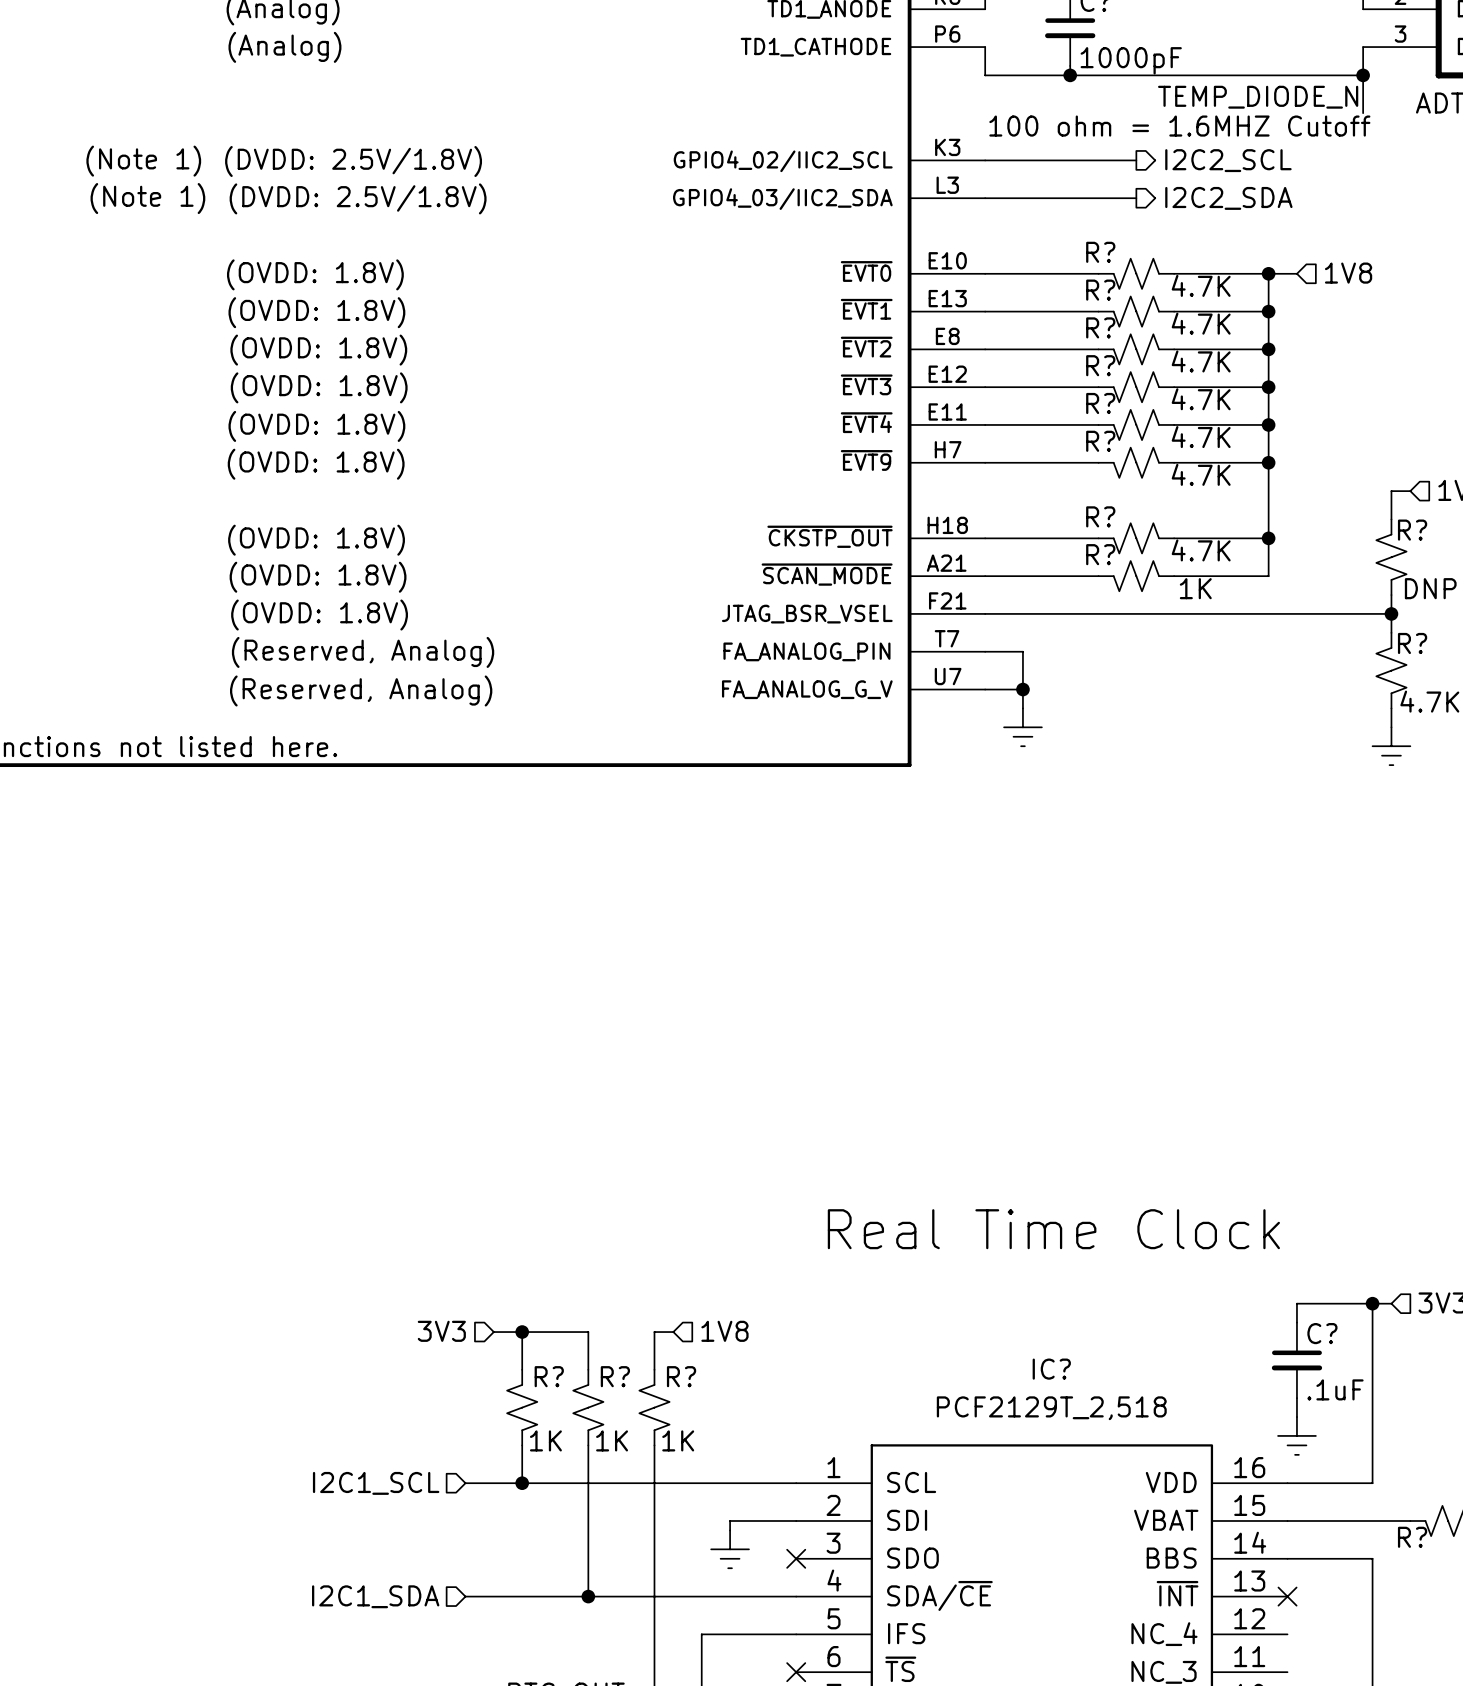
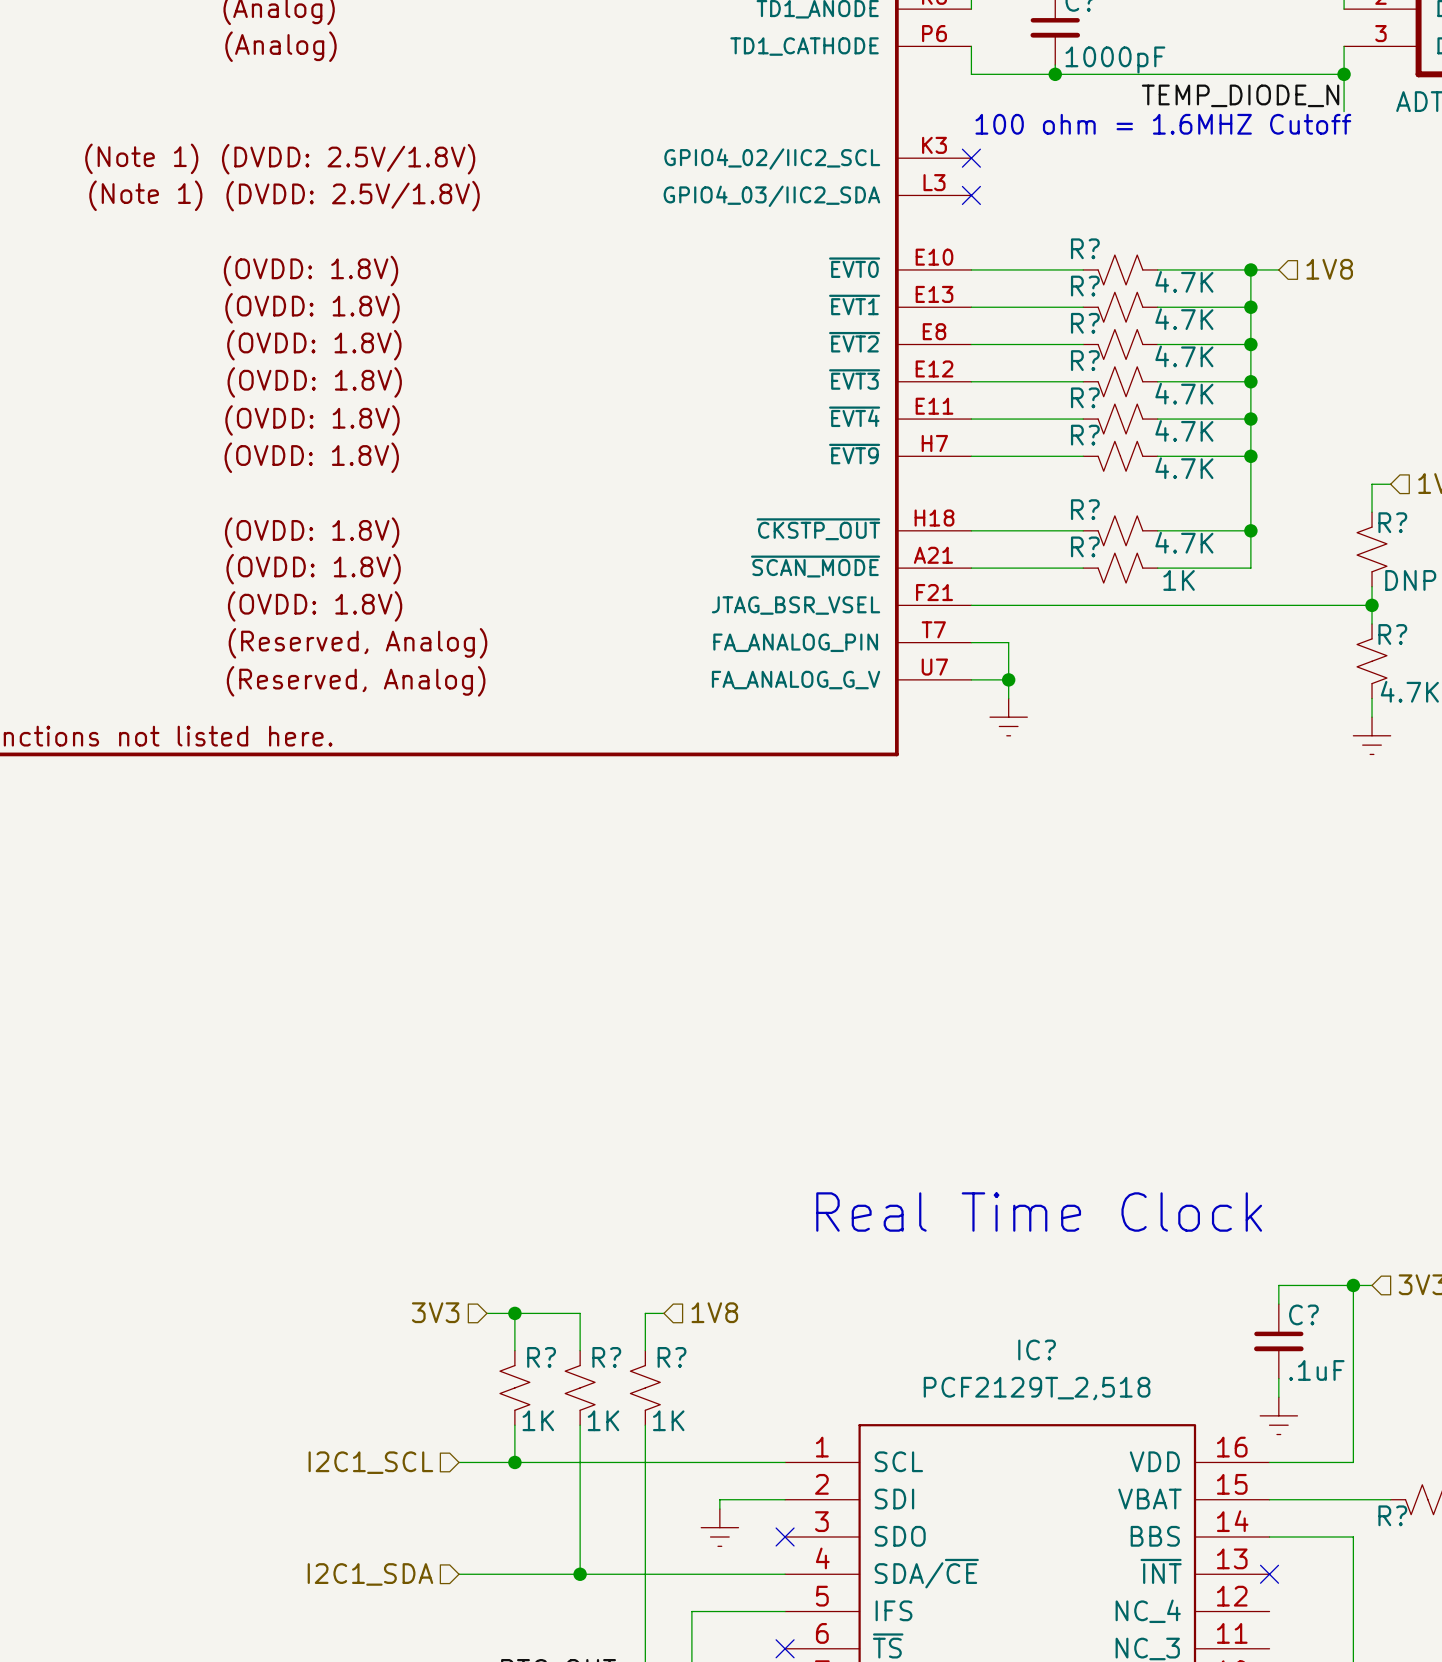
wire: (985, 160) (1136, 160) -> none
no-connect mark: none -> (971, 158)
hierarchical label: I2C2_SCL (1228, 160) -> none
wire: (985, 198) (1136, 198) -> none
no-connect mark: none -> (971, 195)
hierarchical label: I2C2_SDA (1228, 198) -> none

